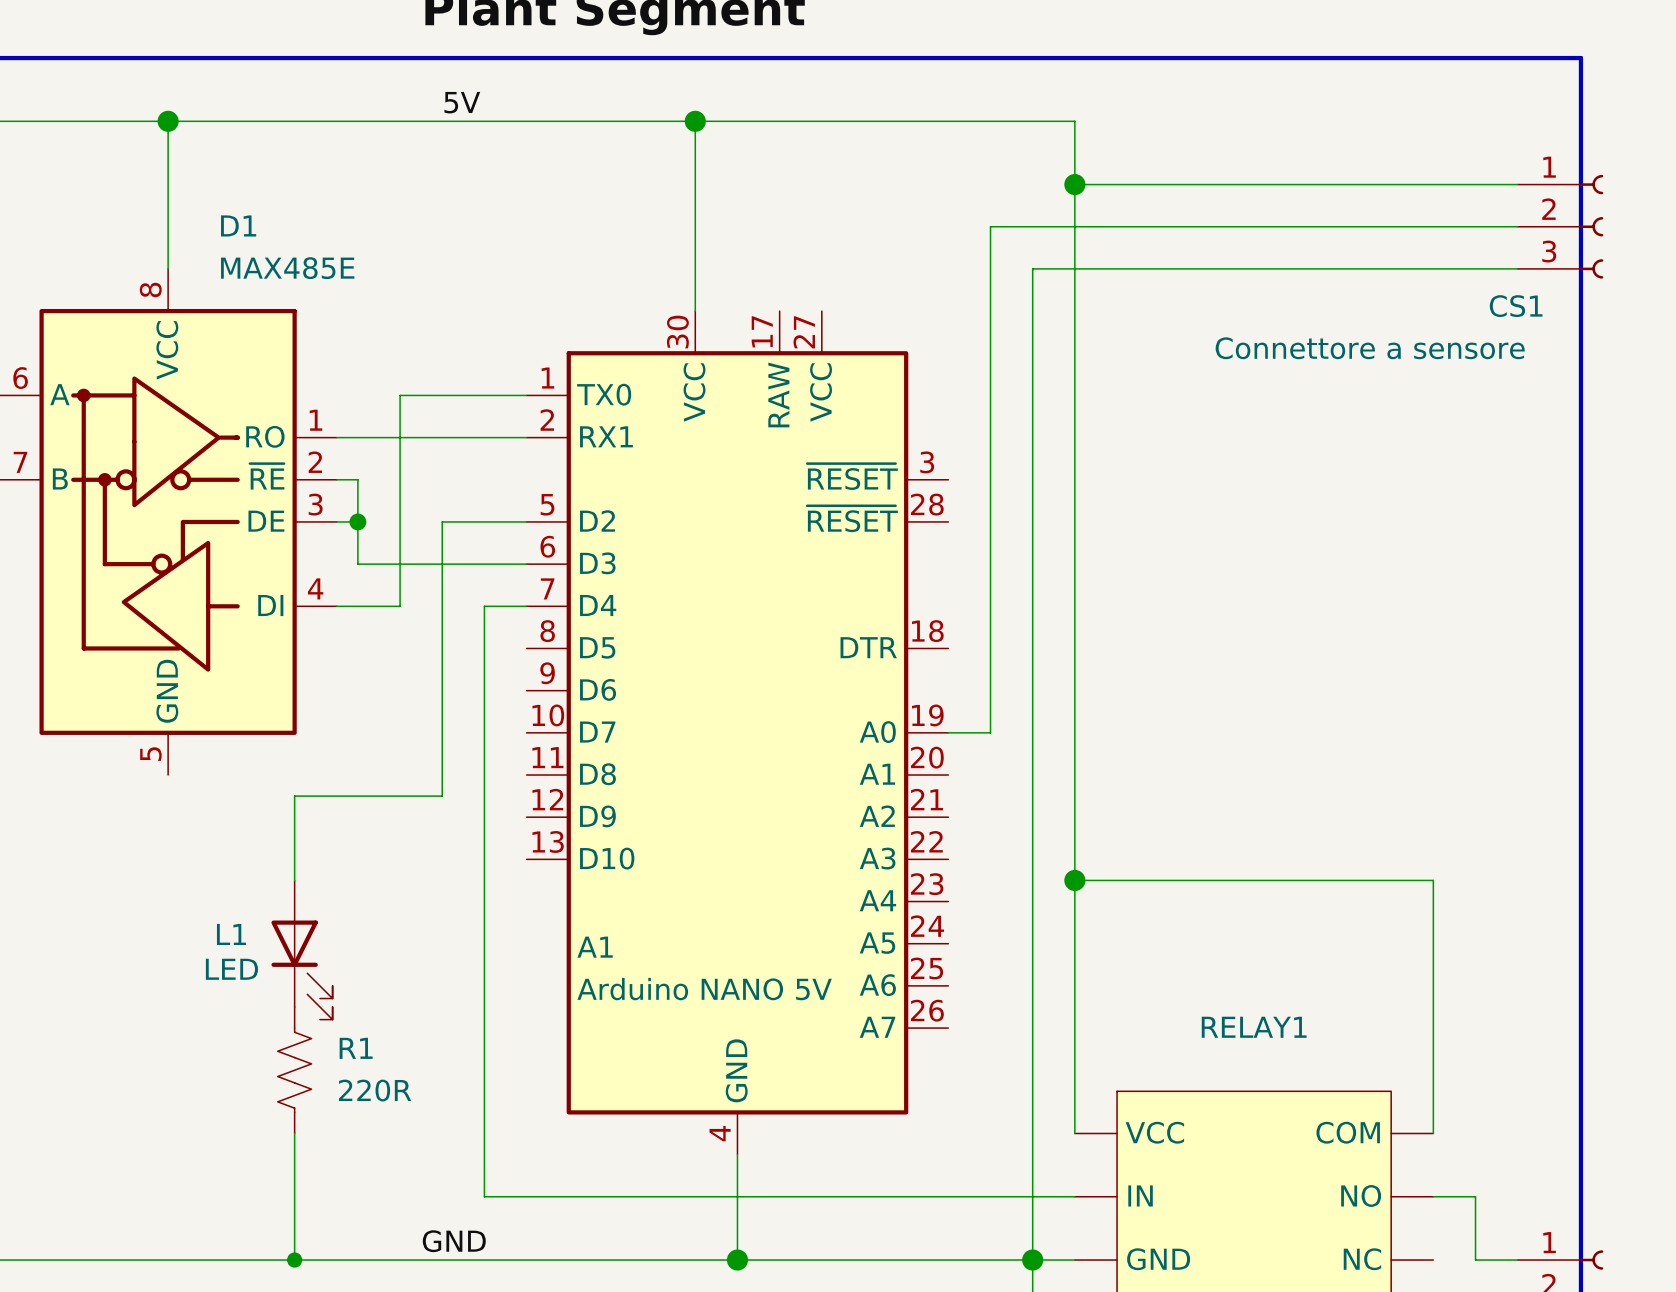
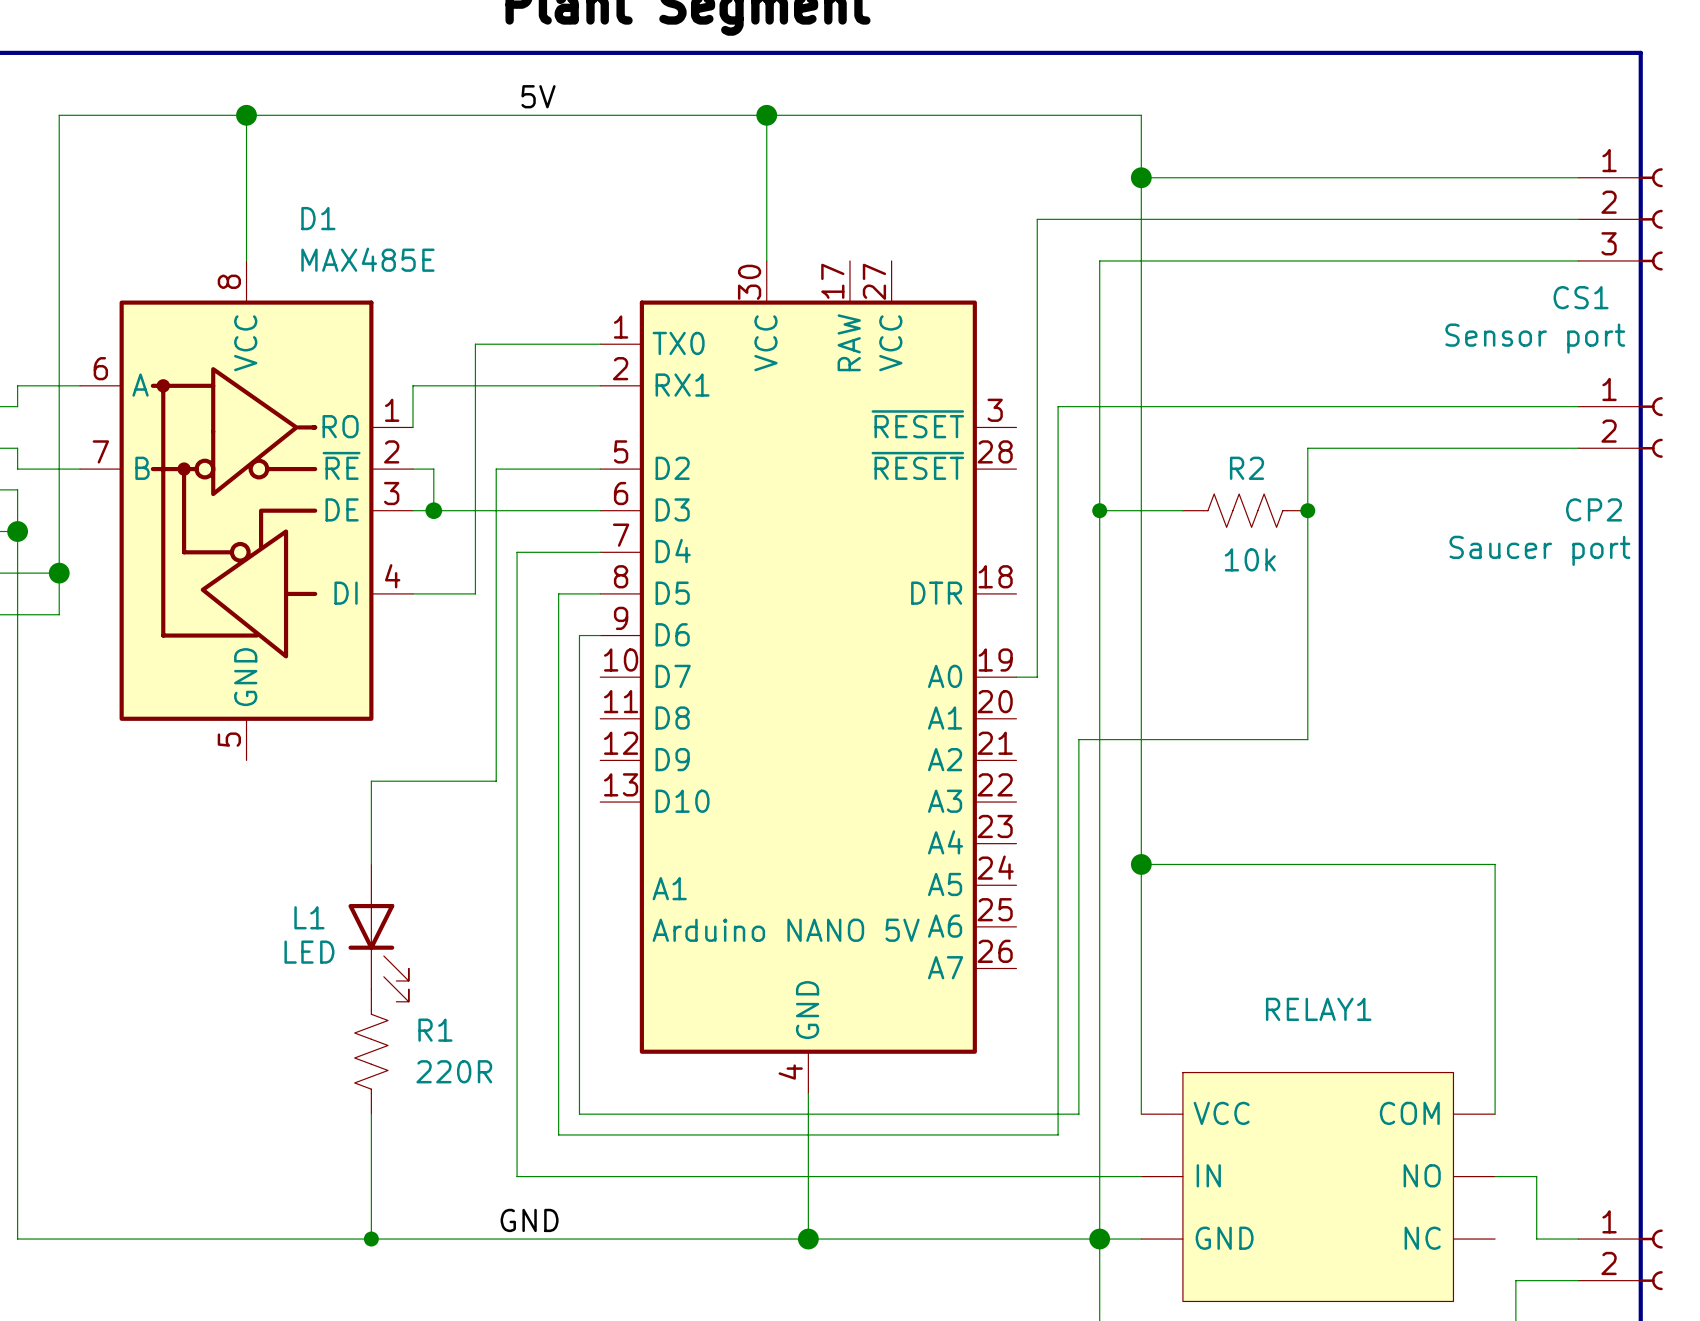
wire: (990, 226) (990, 416) -> (1058, 219) (1037, 219) (1037, 677) (1016, 677)
CS1 value: Connettore a sensore (1370, 348) -> Sensor port (1535, 338)
wire: none -> (1058, 406) (1578, 406)
wire: (336, 437) (526, 437) -> (412, 427) (412, 385) (475, 385) (475, 344) (600, 344)
CP2: none -> Saucer port (1620, 427)
wire: none -> (1578, 448) (1307, 448) (1307, 739) (1078, 739) (1078, 1114) (579, 1114) (579, 635) (600, 635)
wire: (357, 521) (357, 564) (442, 564) (442, 521) -> (433, 510) (517, 510)
wire: none -> (1099, 510) (1182, 510)
junction: none -> (1099, 510)
R2: none -> 10k (1245, 510)
junction: none -> (1307, 510)
A1 position: (737, 732) -> (808, 677)
wire: (948, 732) (990, 732) -> (558, 1134) (1058, 1134) (1058, 718)
wire: (421, 796) (442, 796) -> (496, 781) (496, 469) (600, 469)
wire: (484, 1154) (484, 1196) -> (517, 781) (517, 1176) (558, 1176)

